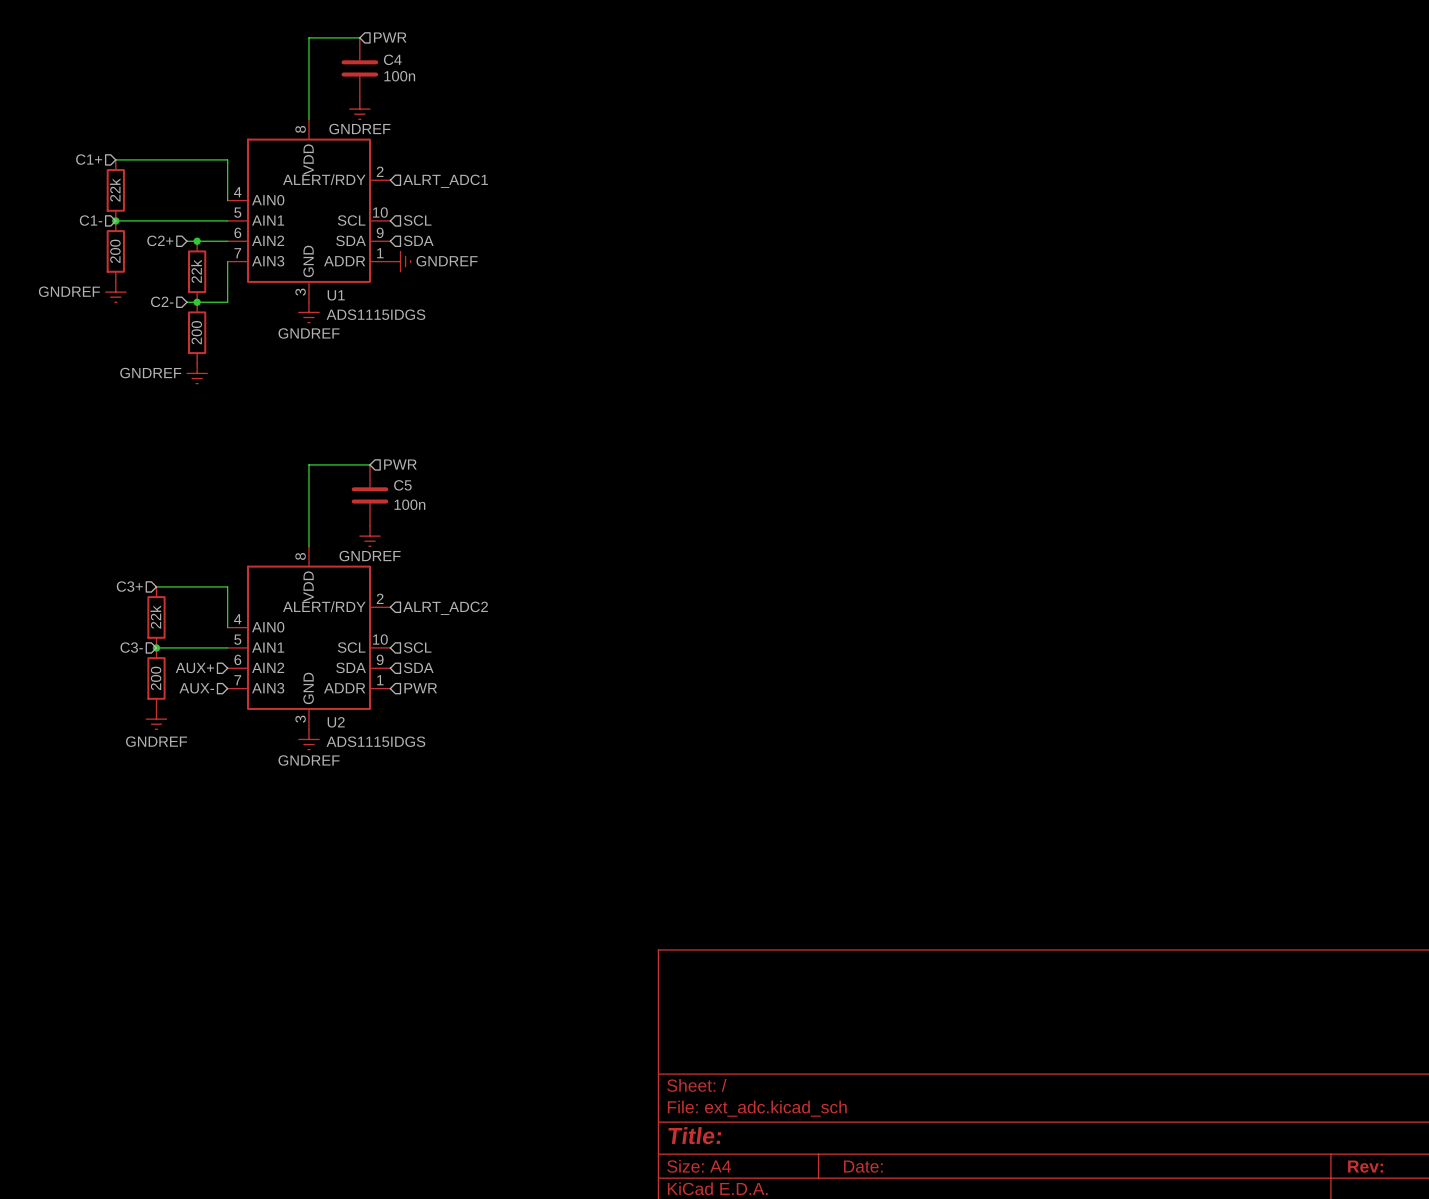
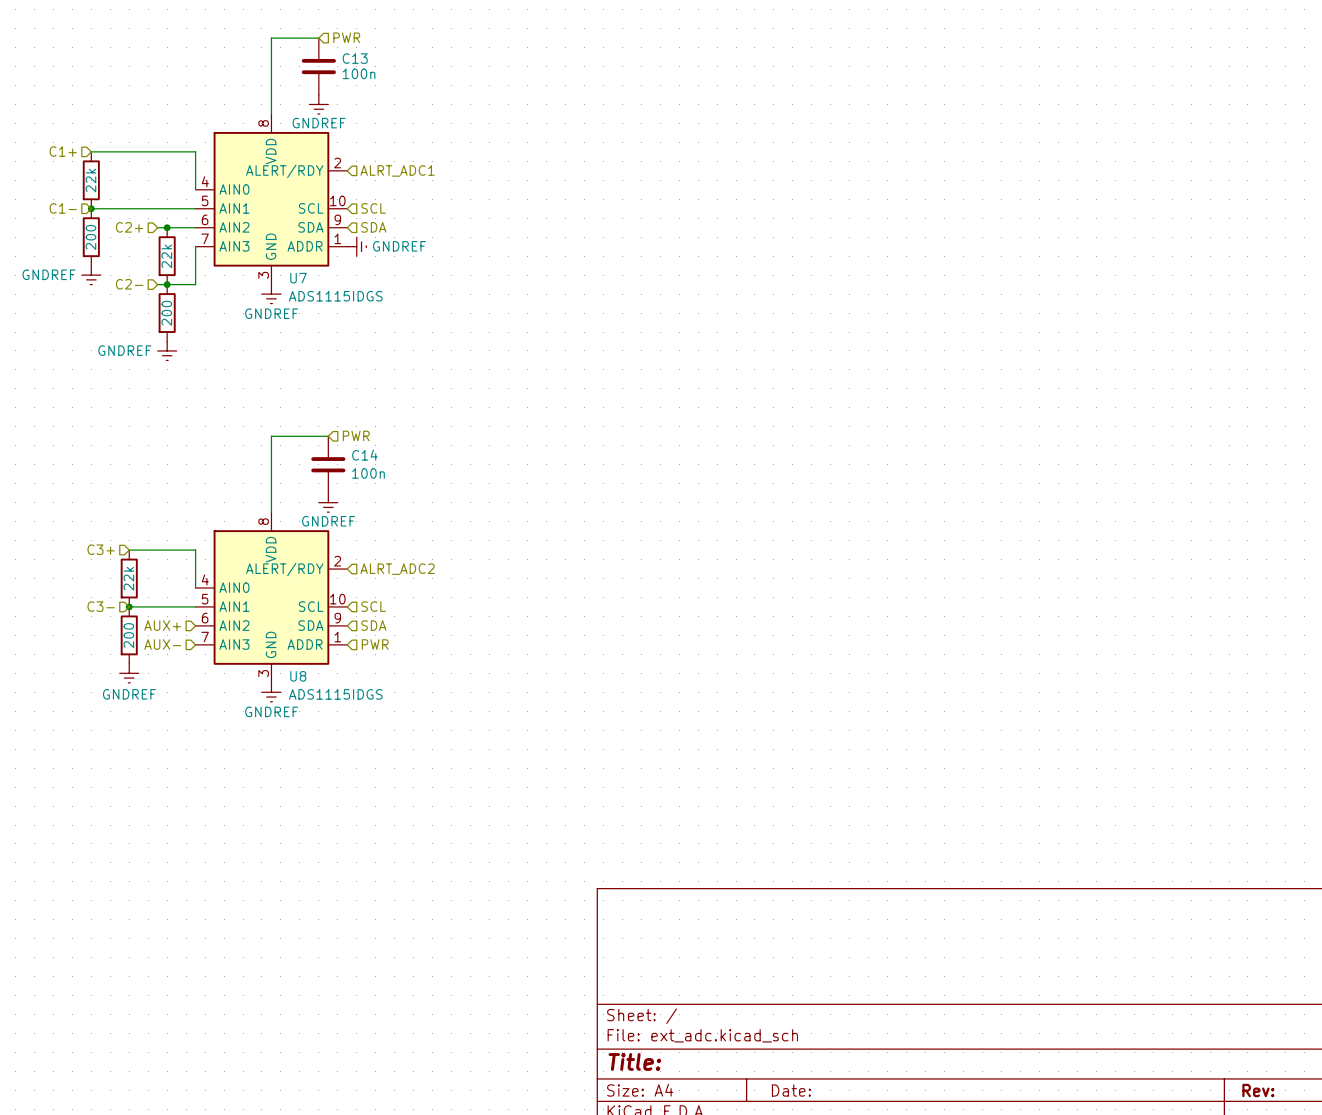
C4 name: C4 (392, 59) -> C13 (355, 58)
U1 name: U1 (336, 295) -> U7 (298, 278)
C5 name: C5 (402, 485) -> C14 (364, 455)
U2 name: U2 (336, 722) -> U8 (298, 676)

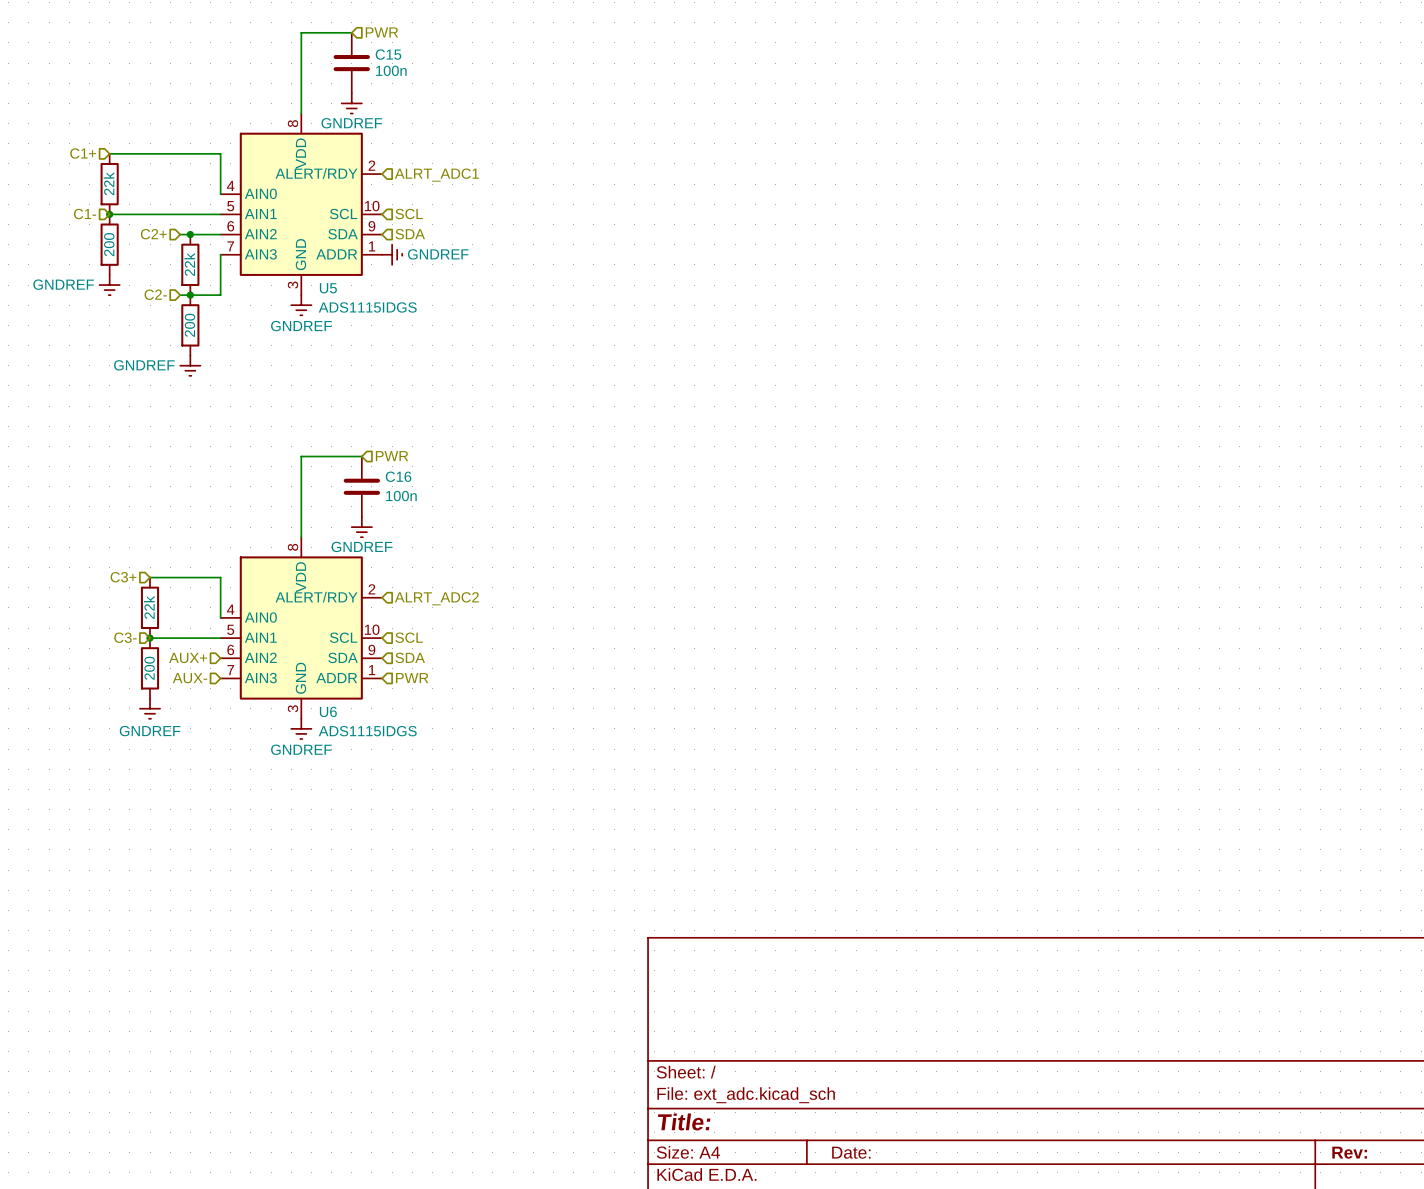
C13 name: C13 (355, 58) -> C15 (388, 54)
U7 name: U7 (298, 278) -> U5 (328, 288)
C14 name: C14 (364, 455) -> C16 (398, 476)
U8 name: U8 (298, 676) -> U6 (328, 711)

